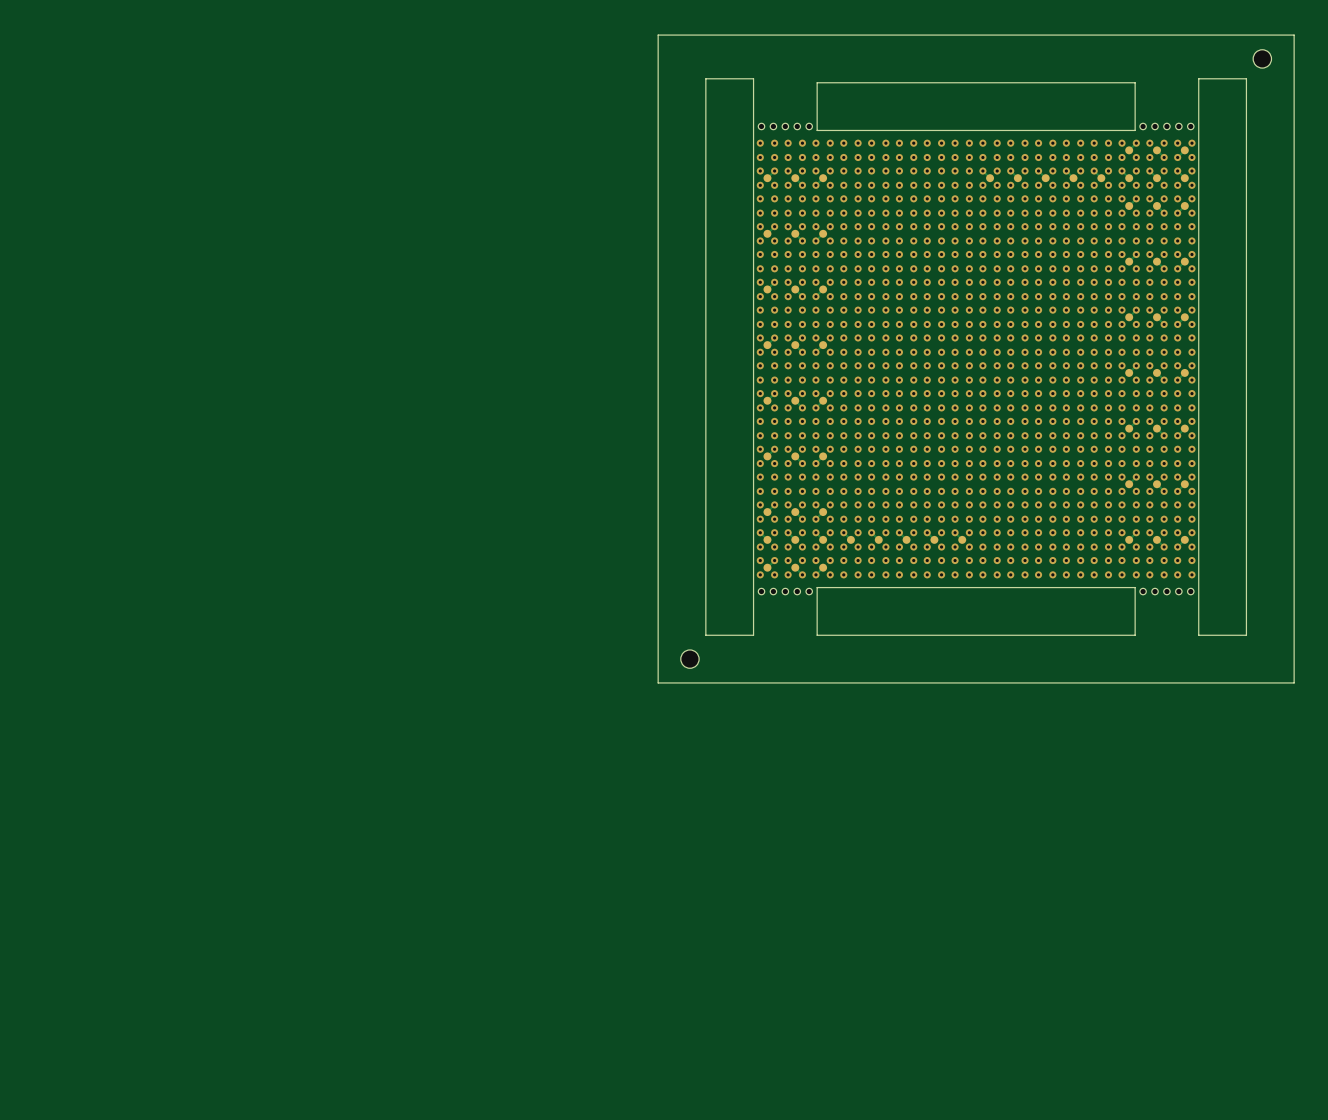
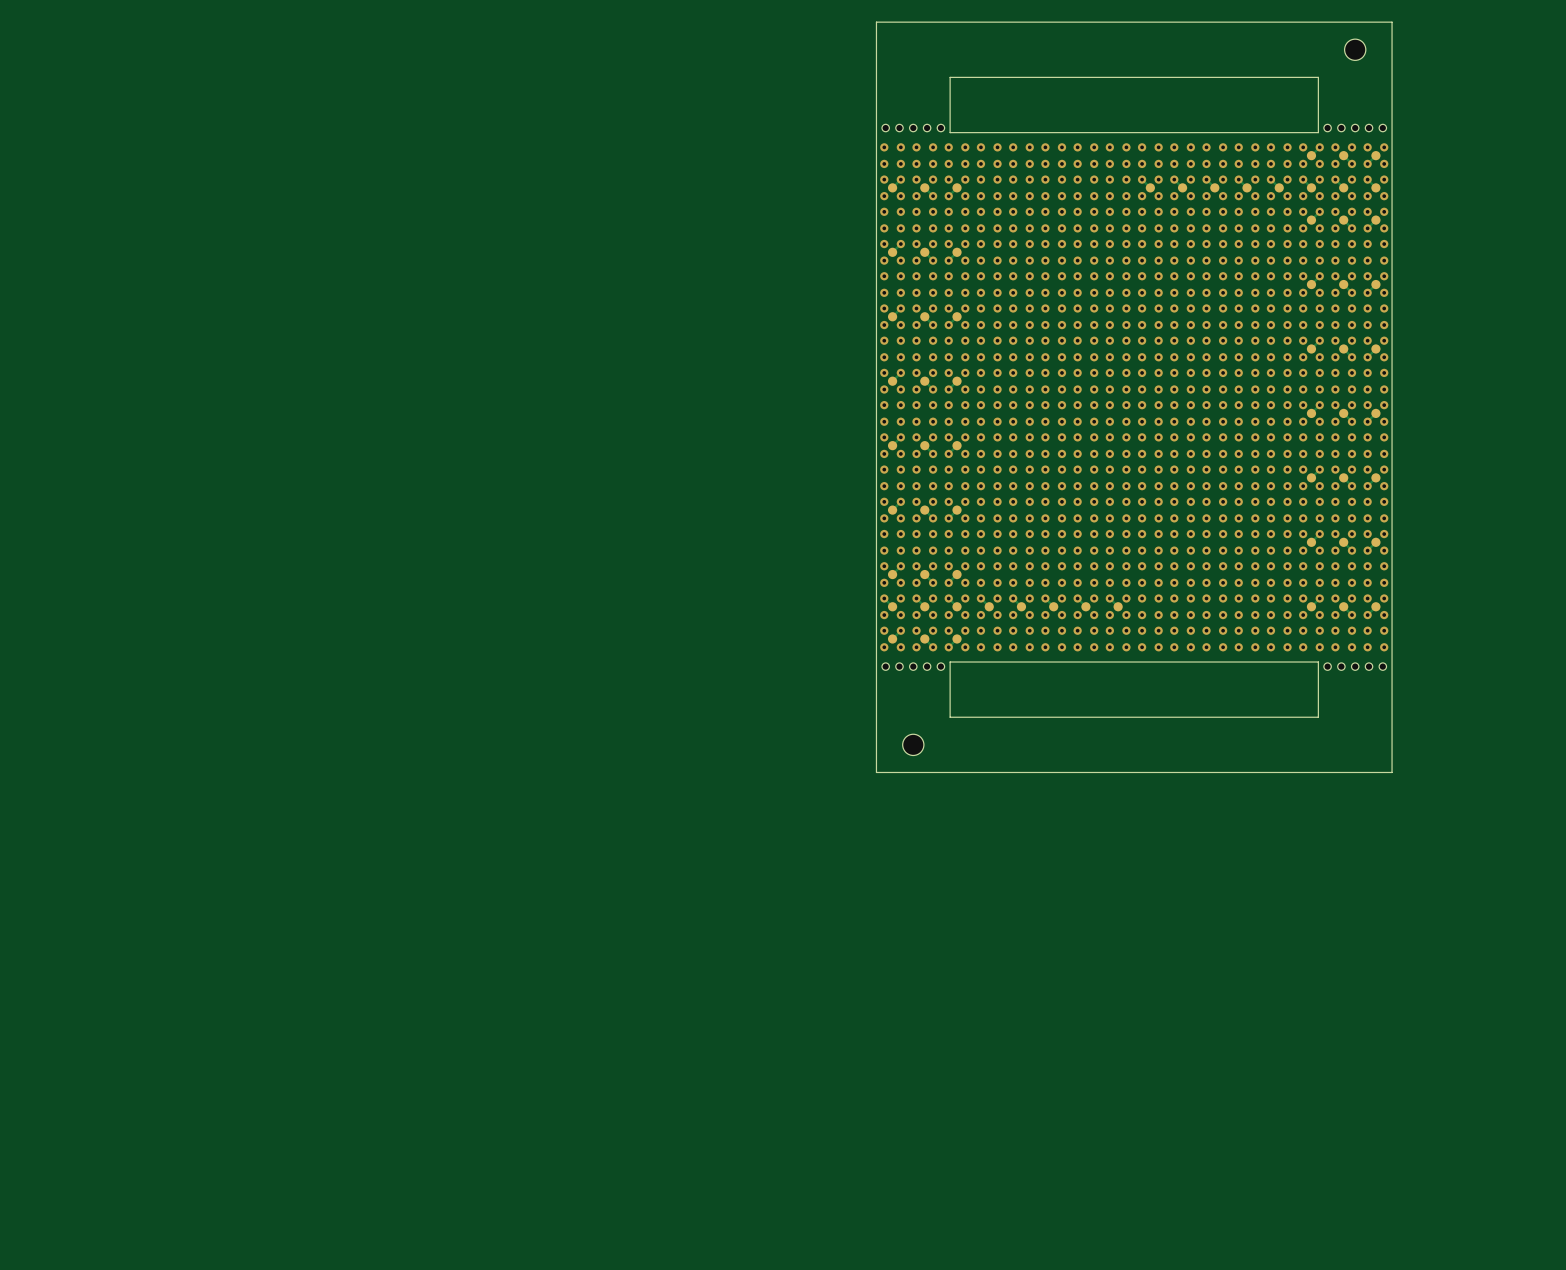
board edge: (753, 35) (658, 35) (658, 682) (753, 682) -> (876, 717) (876, 772)
board edge: (1198, 35) (1294, 35) (1294, 682) (1198, 682) -> (1392, 717) (1392, 772)
part position: (1262, 58) -> (1355, 49)
board edge: (753, 78) (705, 78) (705, 635) (753, 635) -> (876, 72) (876, 22)
board edge: (1198, 78) (1246, 78) (1246, 635) (1198, 635) -> (1392, 72) (1392, 22)
part position: (689, 659) -> (913, 744)

